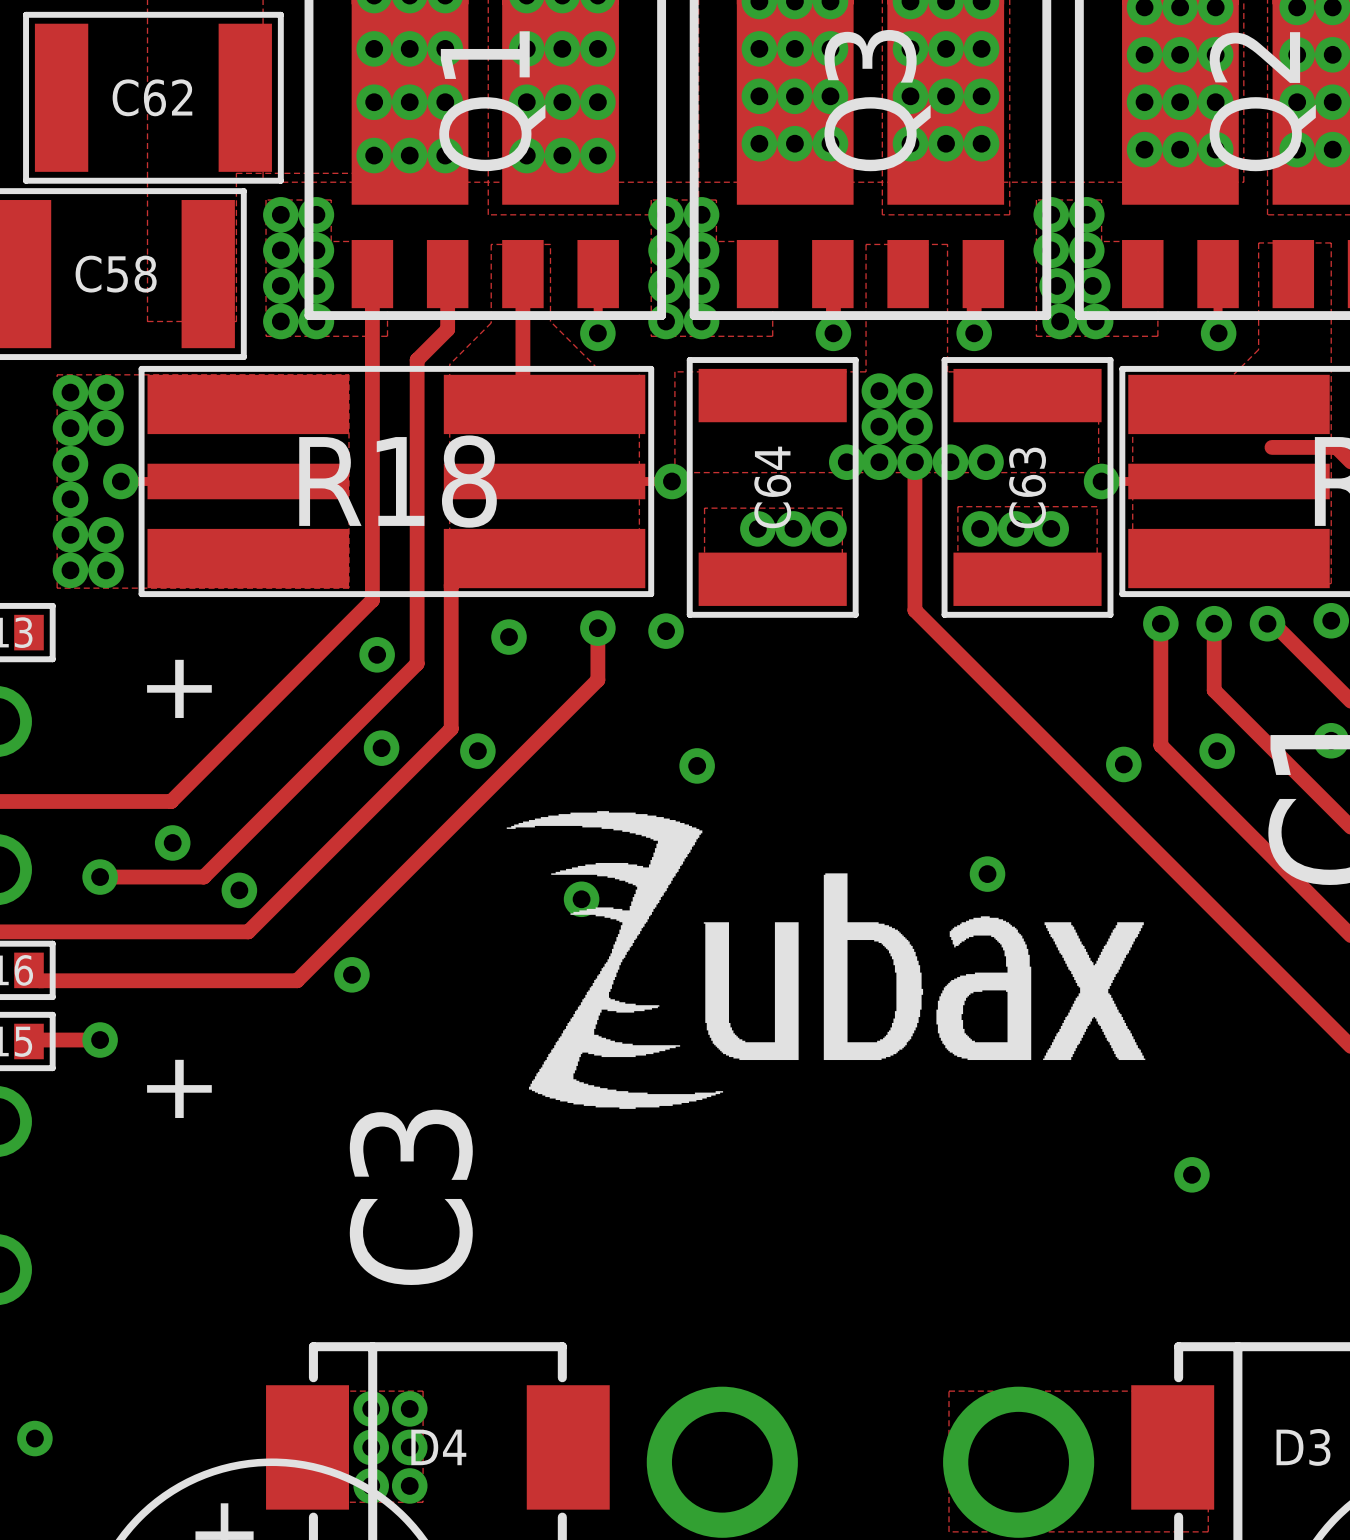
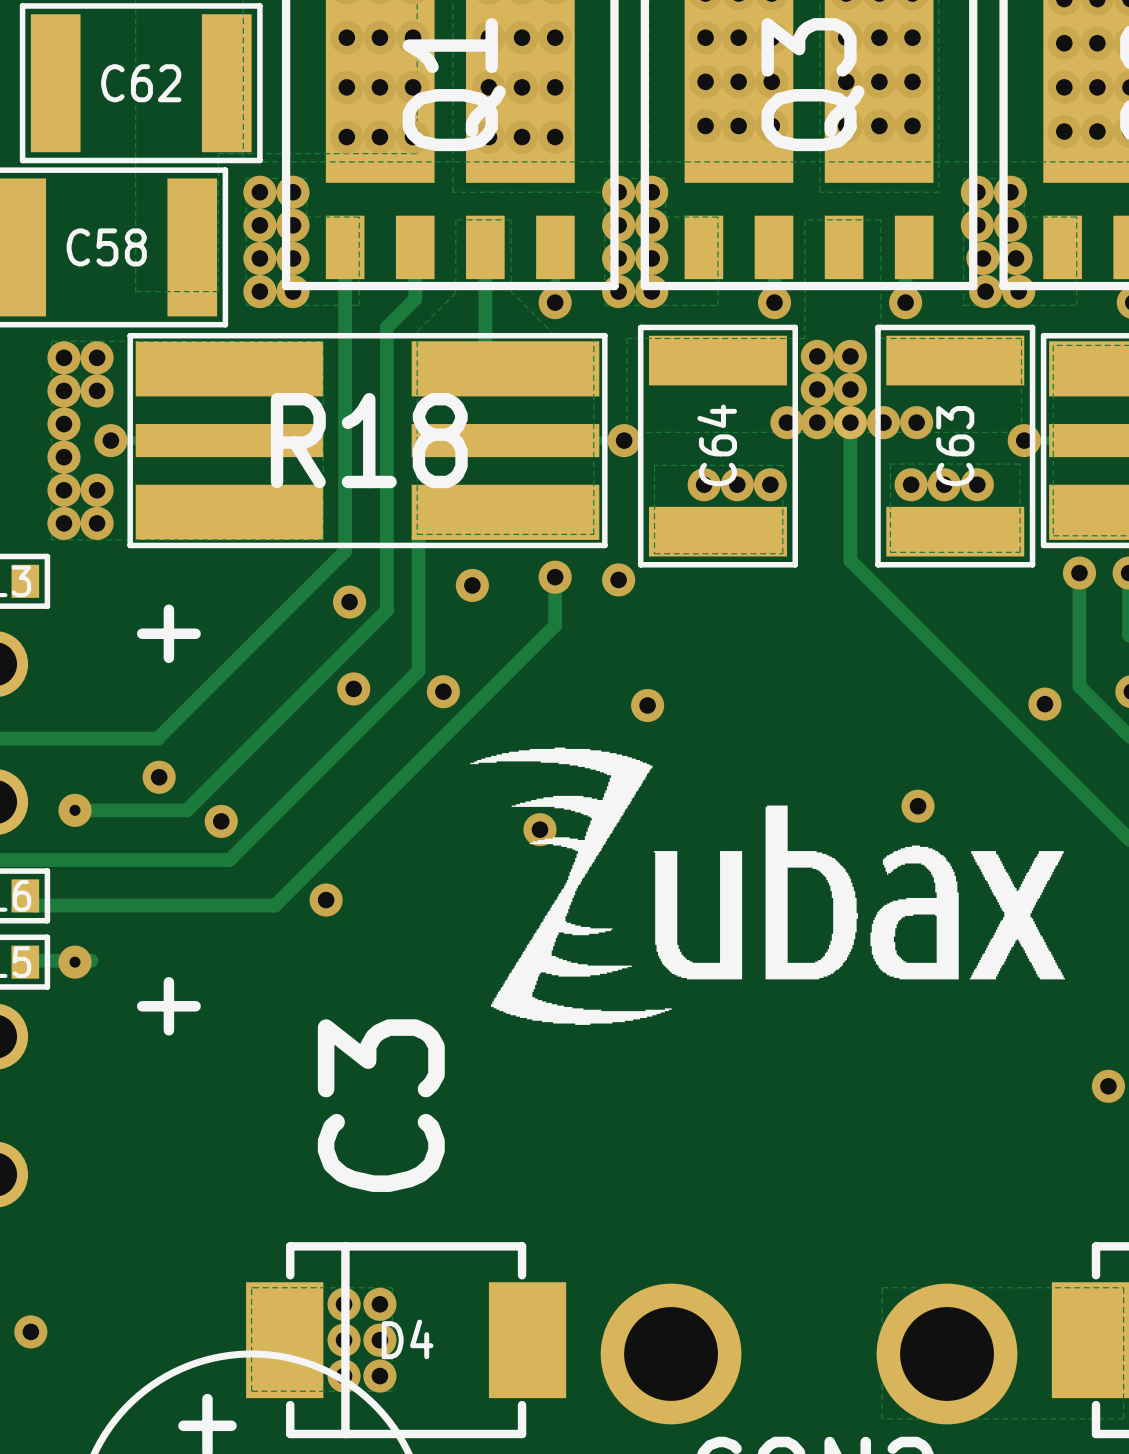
track: (100, 877) (203, 877) -> (75, 810) (188, 808)
via position: (100, 877) -> (75, 810)
via position: (100, 1040) -> (75, 962)

